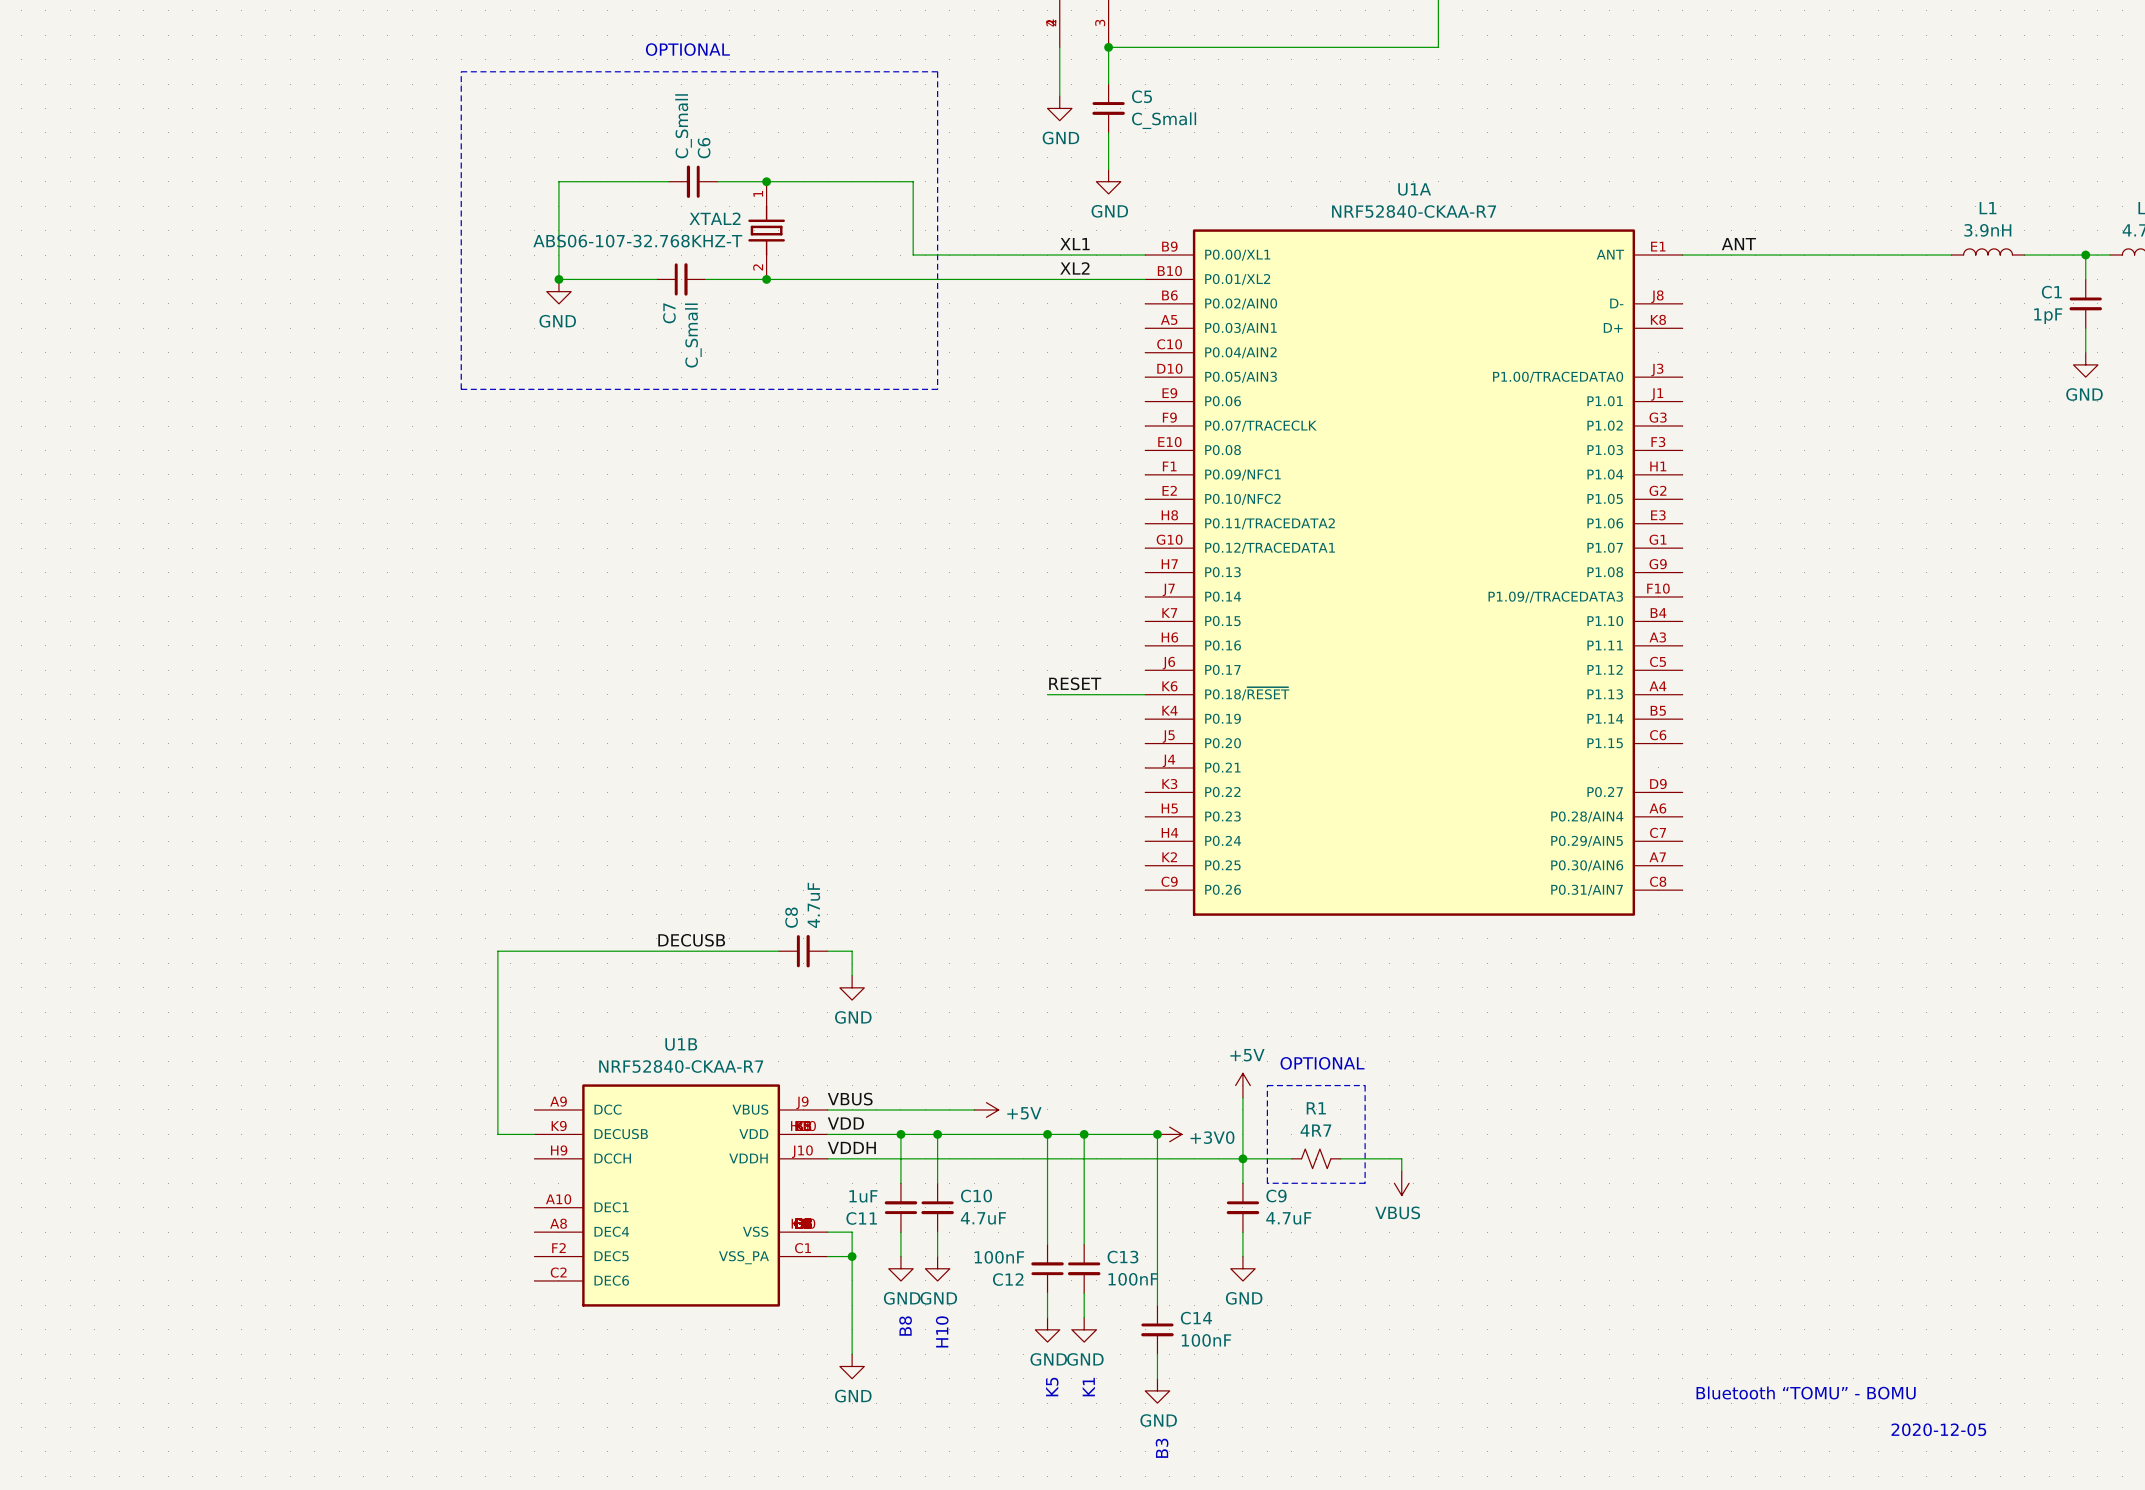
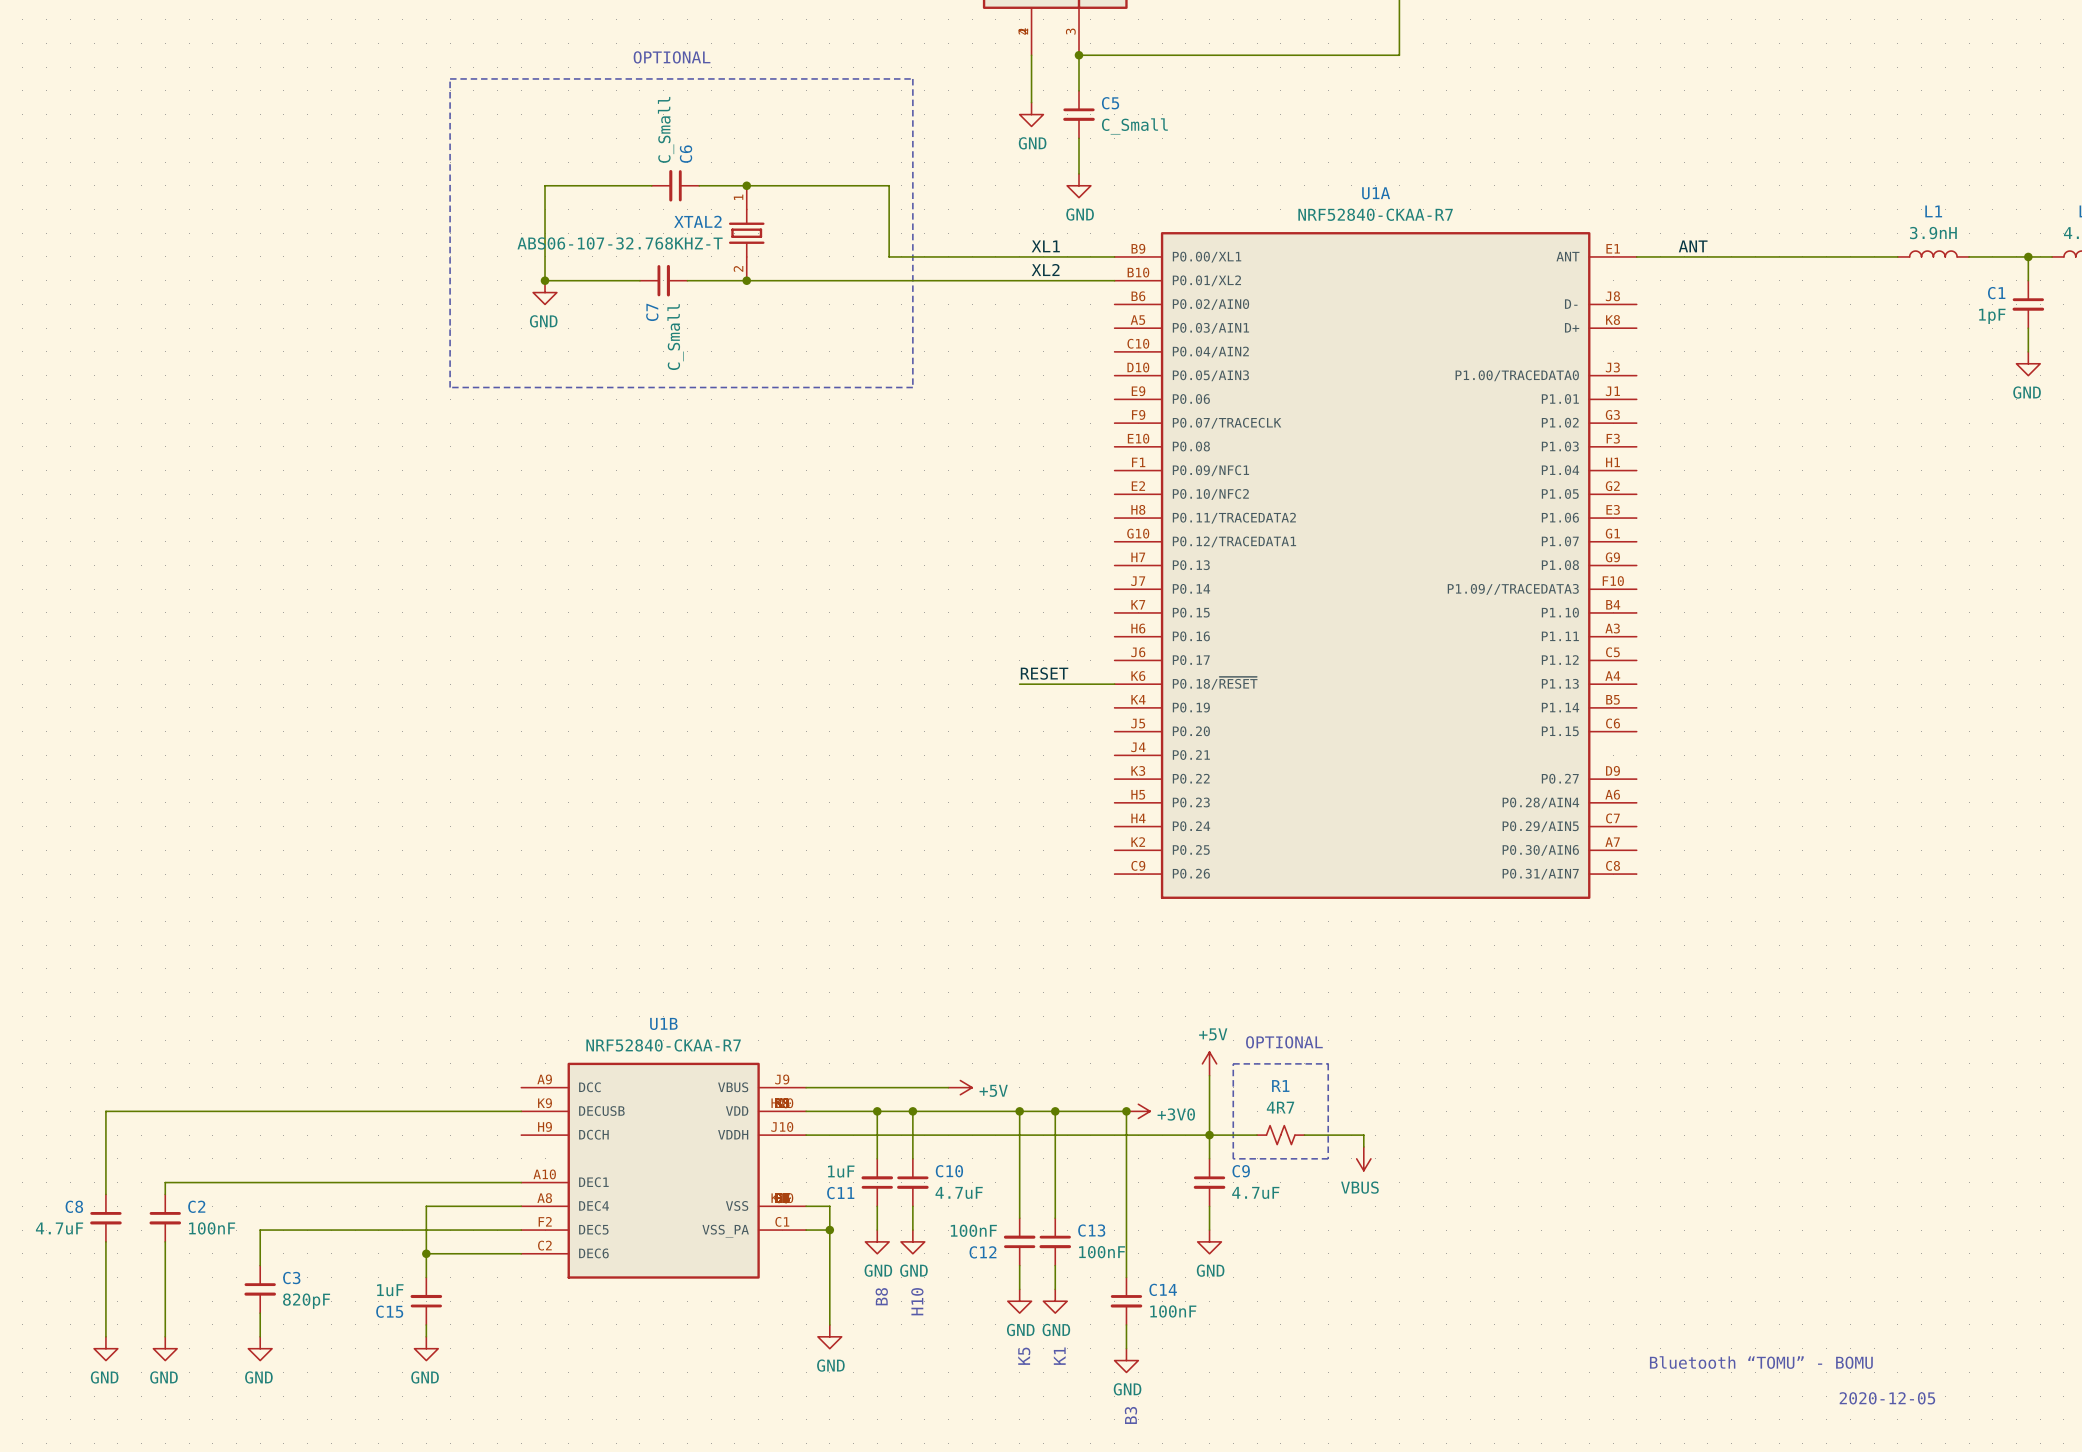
C8 value position: 4.7uF (813, 905) -> 4.7uF (59, 1228)
C8 name position: C8 (791, 917) -> C8 (74, 1206)
label: DECUSB (691, 940) -> none
wire: (778, 951) (497, 951) (497, 1134) -> (105, 1194) (105, 1111) (485, 1111)
C8 rotation: 0° (803, 951) -> 90° clockwise (105, 1218)
C8 position: (803, 951) -> (105, 1218)
wire: (827, 951) (852, 951) (852, 975) -> none
power symbol: GND (852, 987) -> none
label: VBUS (850, 1099) -> none
label: VDD (845, 1123) -> none
label: VDDH (851, 1147) -> none
wire: none -> (521, 1182) (165, 1182) (165, 1194)
wire: none -> (521, 1206) (426, 1206) (426, 1277)
C2: none -> 100nF (165, 1218)
wire: none -> (521, 1230) (260, 1230) (260, 1265)
wire: none -> (105, 1241) (105, 1336)
wire: none -> (165, 1241) (165, 1336)
wire: none -> (426, 1253) (521, 1253)
junction: none -> (426, 1253)
C3: none -> 820pF (260, 1289)
C15: none -> 1uF (426, 1301)
wire: none -> (260, 1313) (260, 1336)
wire: none -> (426, 1324) (426, 1336)
power symbol: none -> GND (105, 1348)
power symbol: none -> GND (165, 1348)
power symbol: none -> GND (260, 1348)
power symbol: none -> GND (426, 1348)

